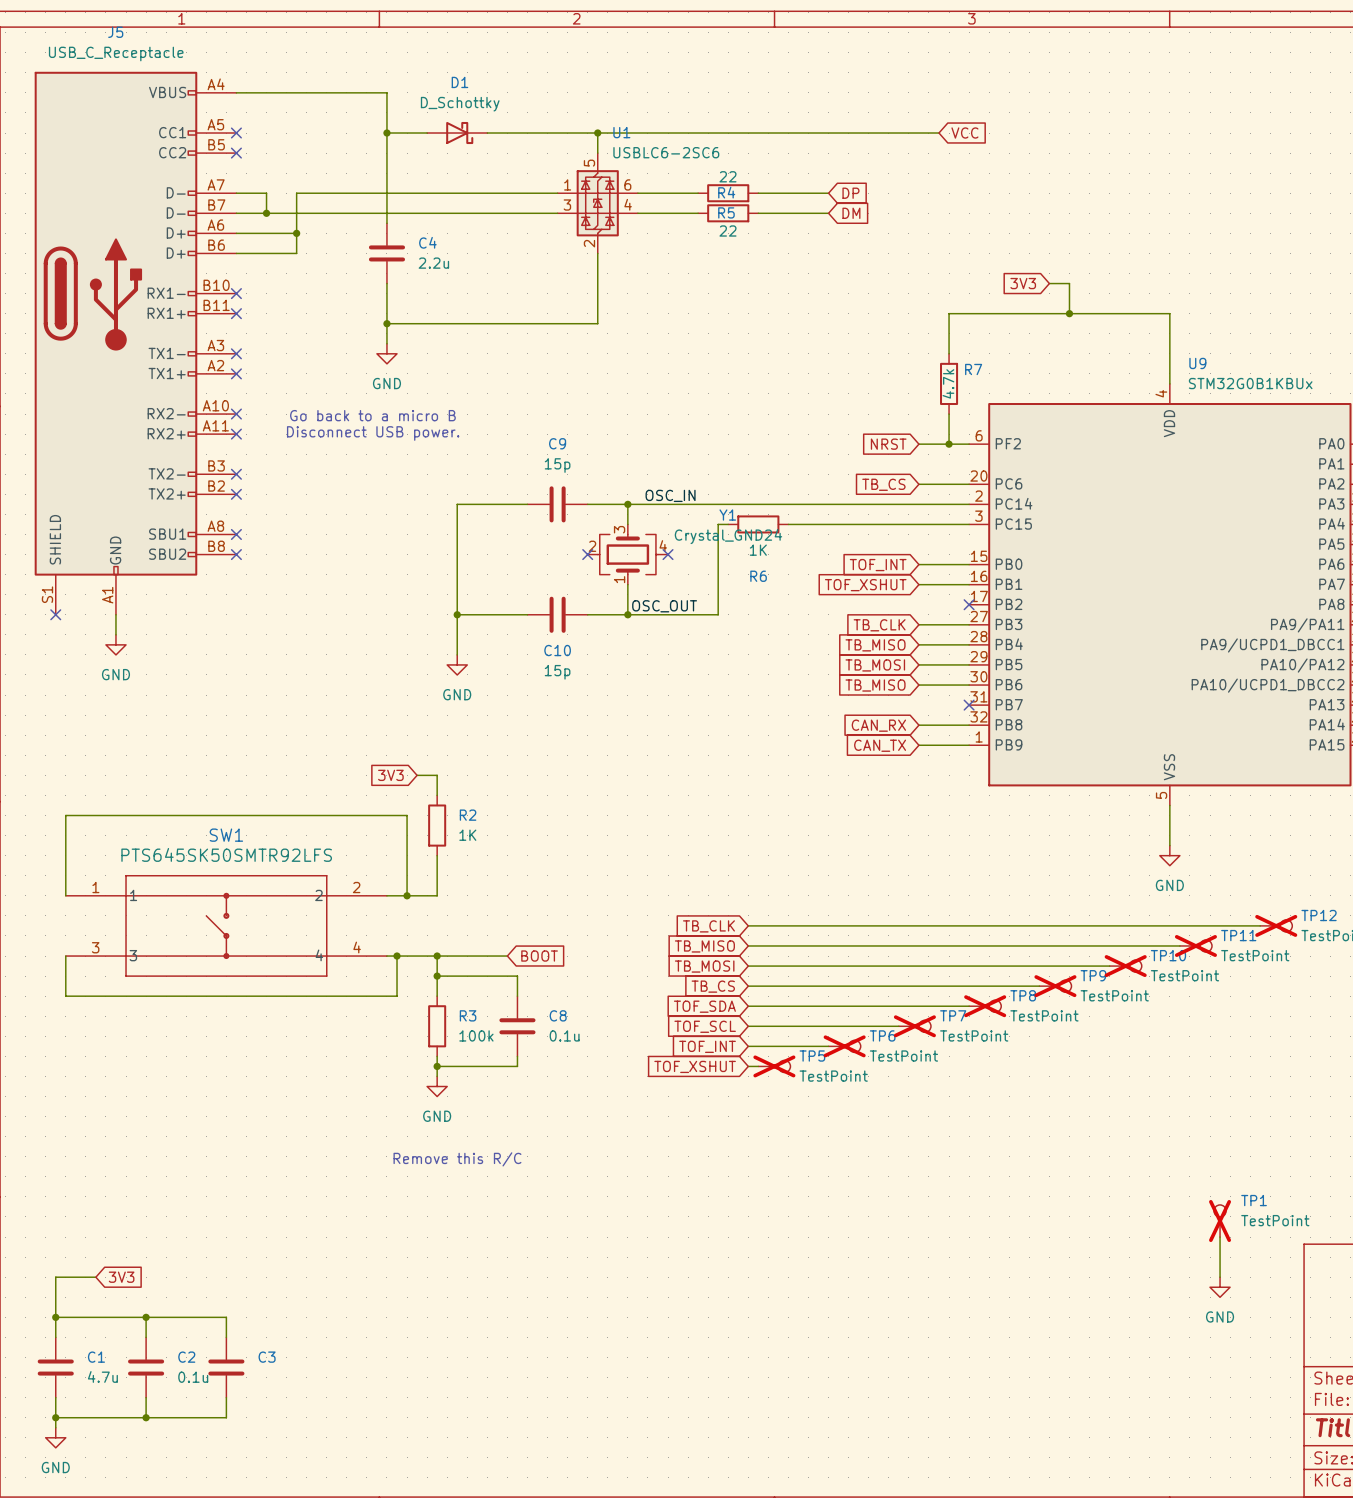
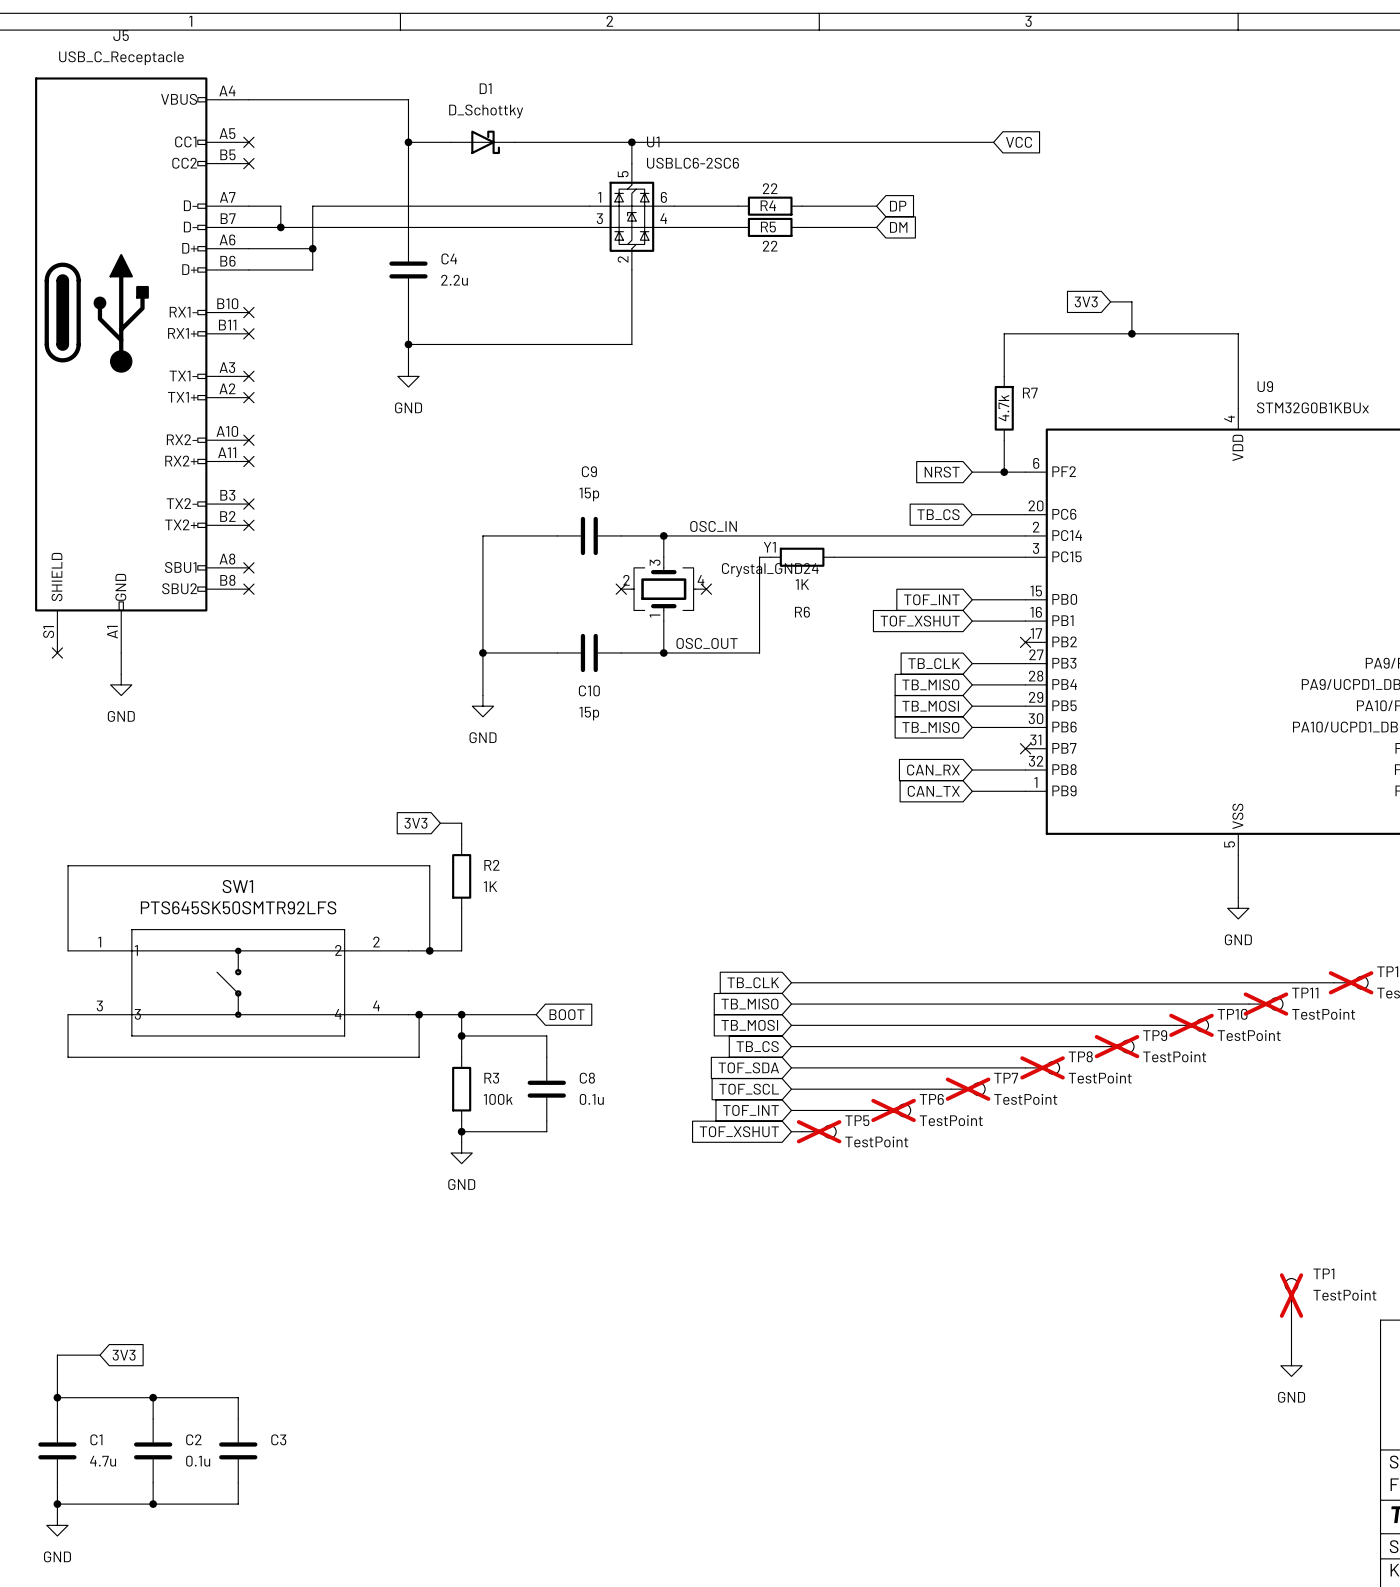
text: Go back to a micro B (372, 415) -> none
text: Disconnect USB power. (373, 433) -> none
text: Remove this R/C (457, 1159) -> none

